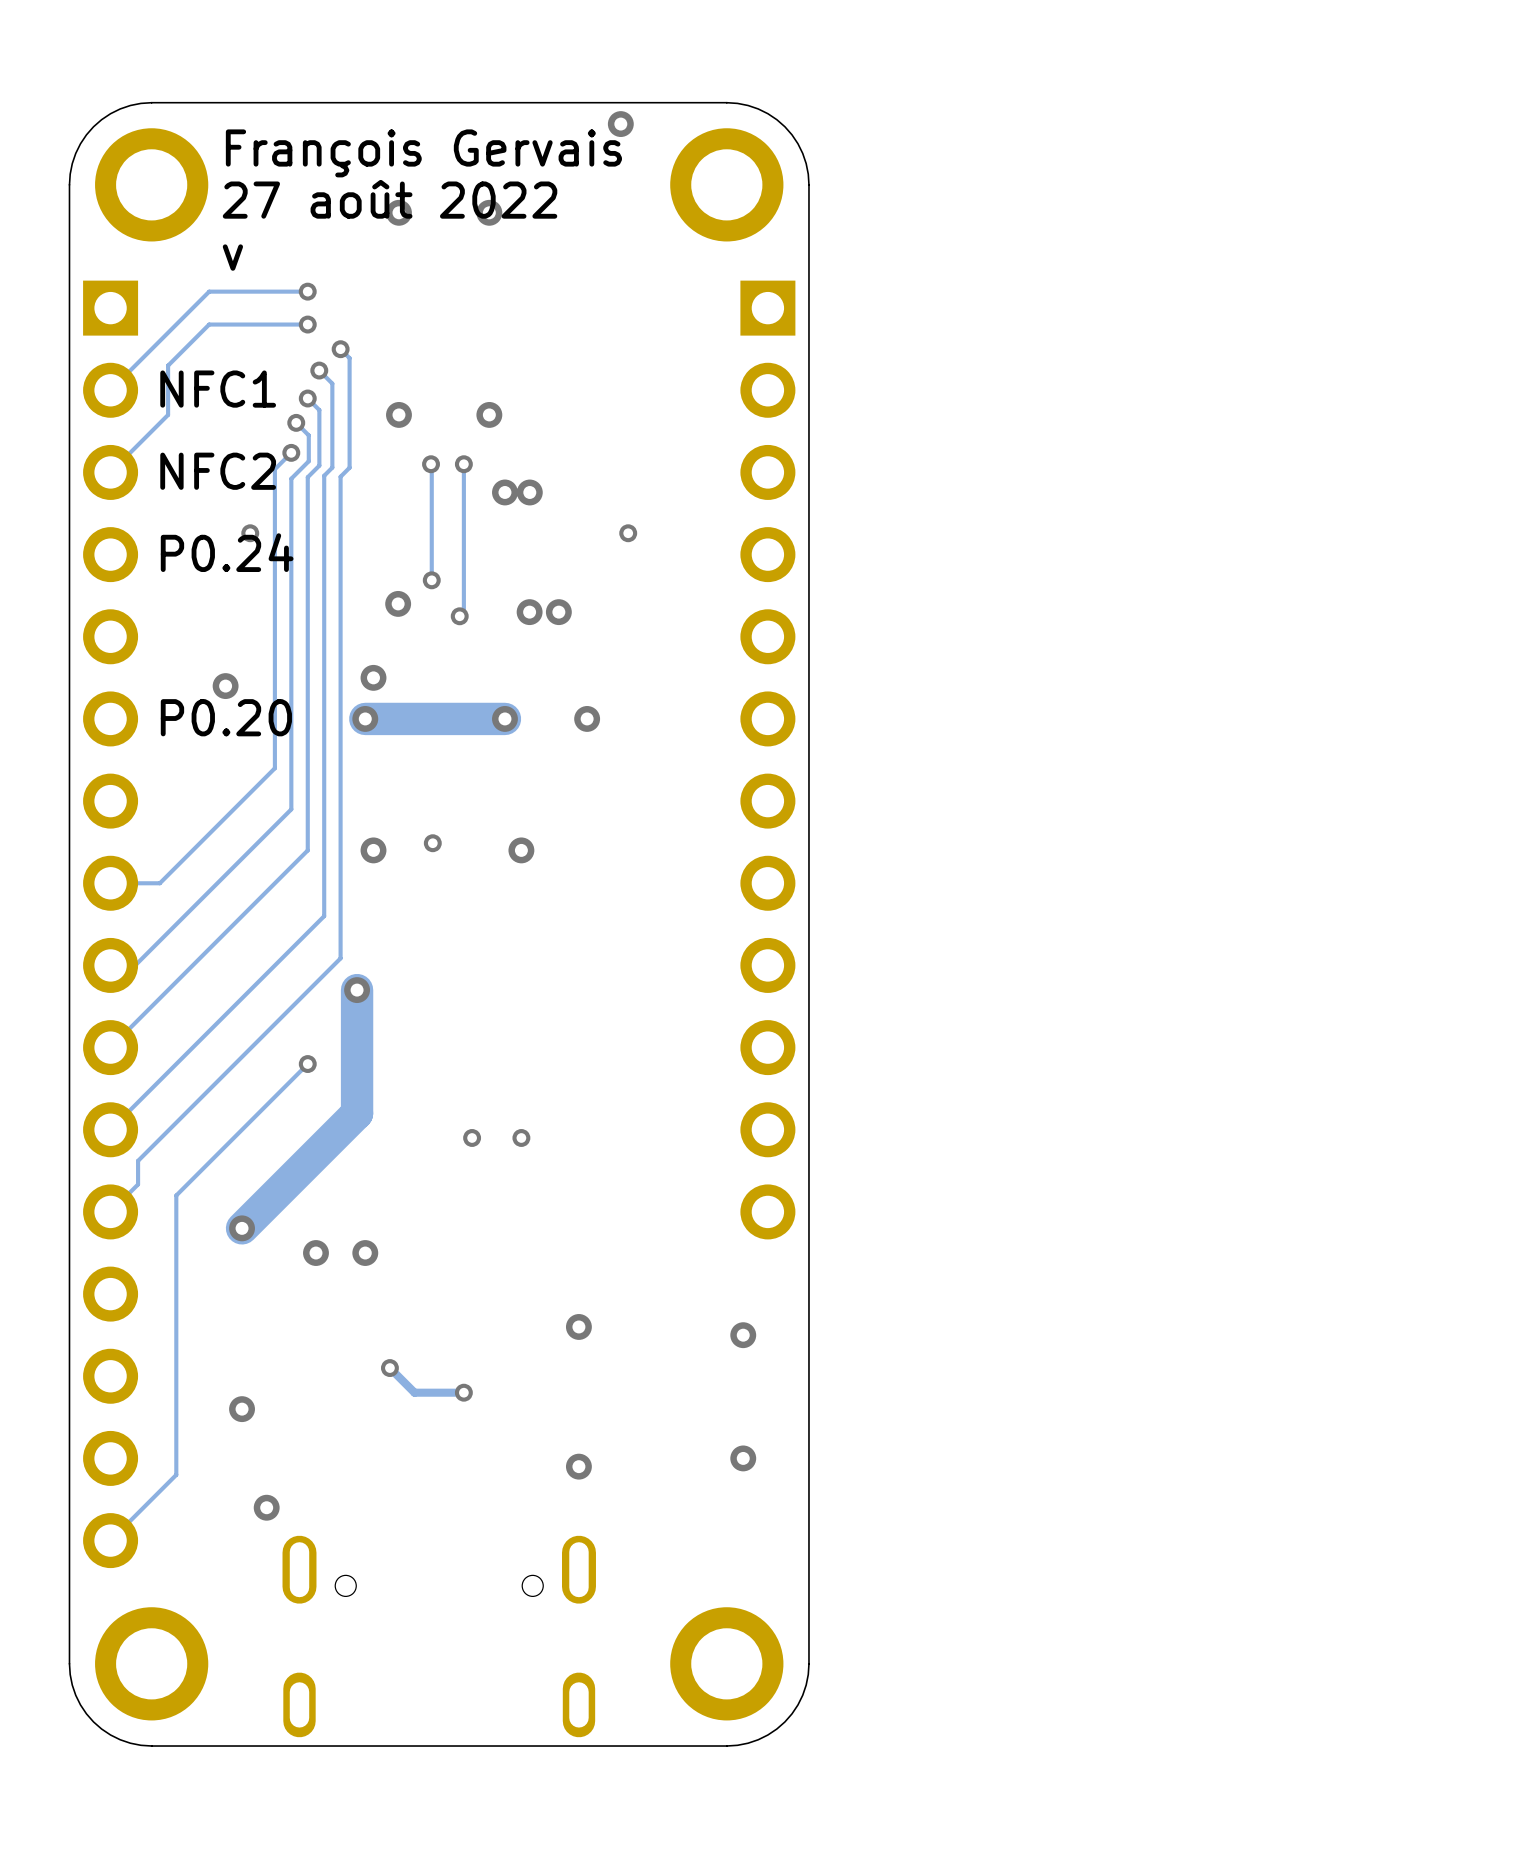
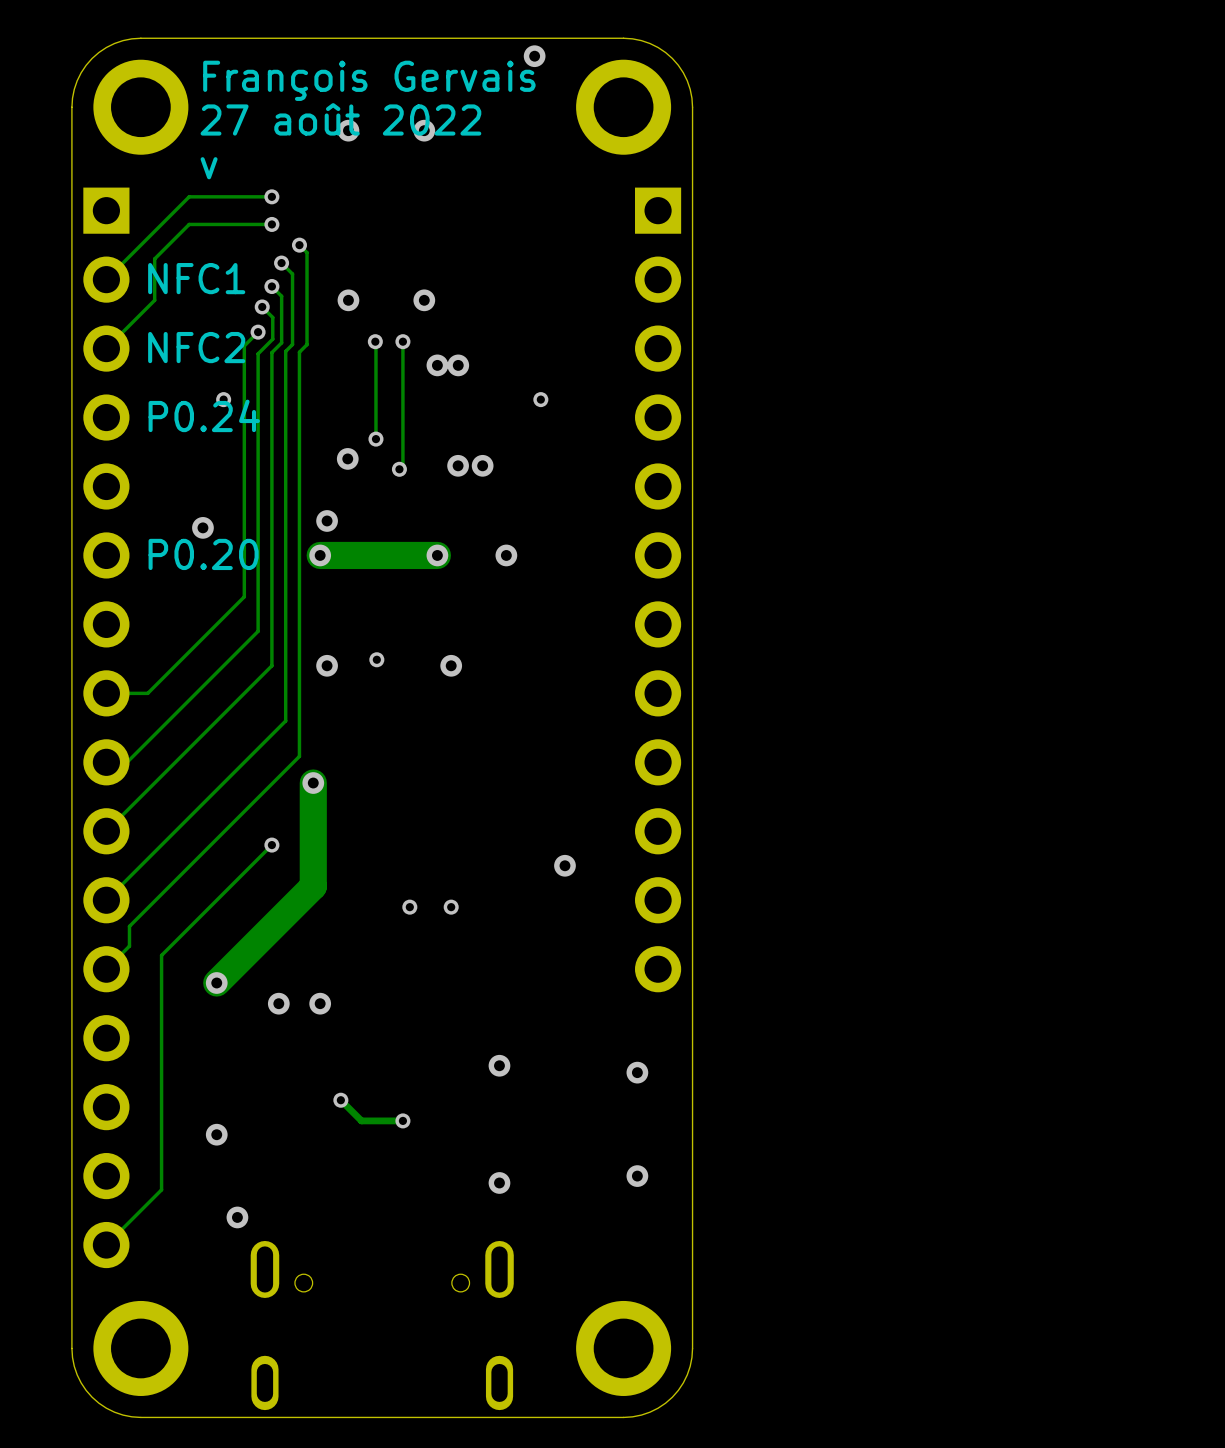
via: none -> (564, 865)

